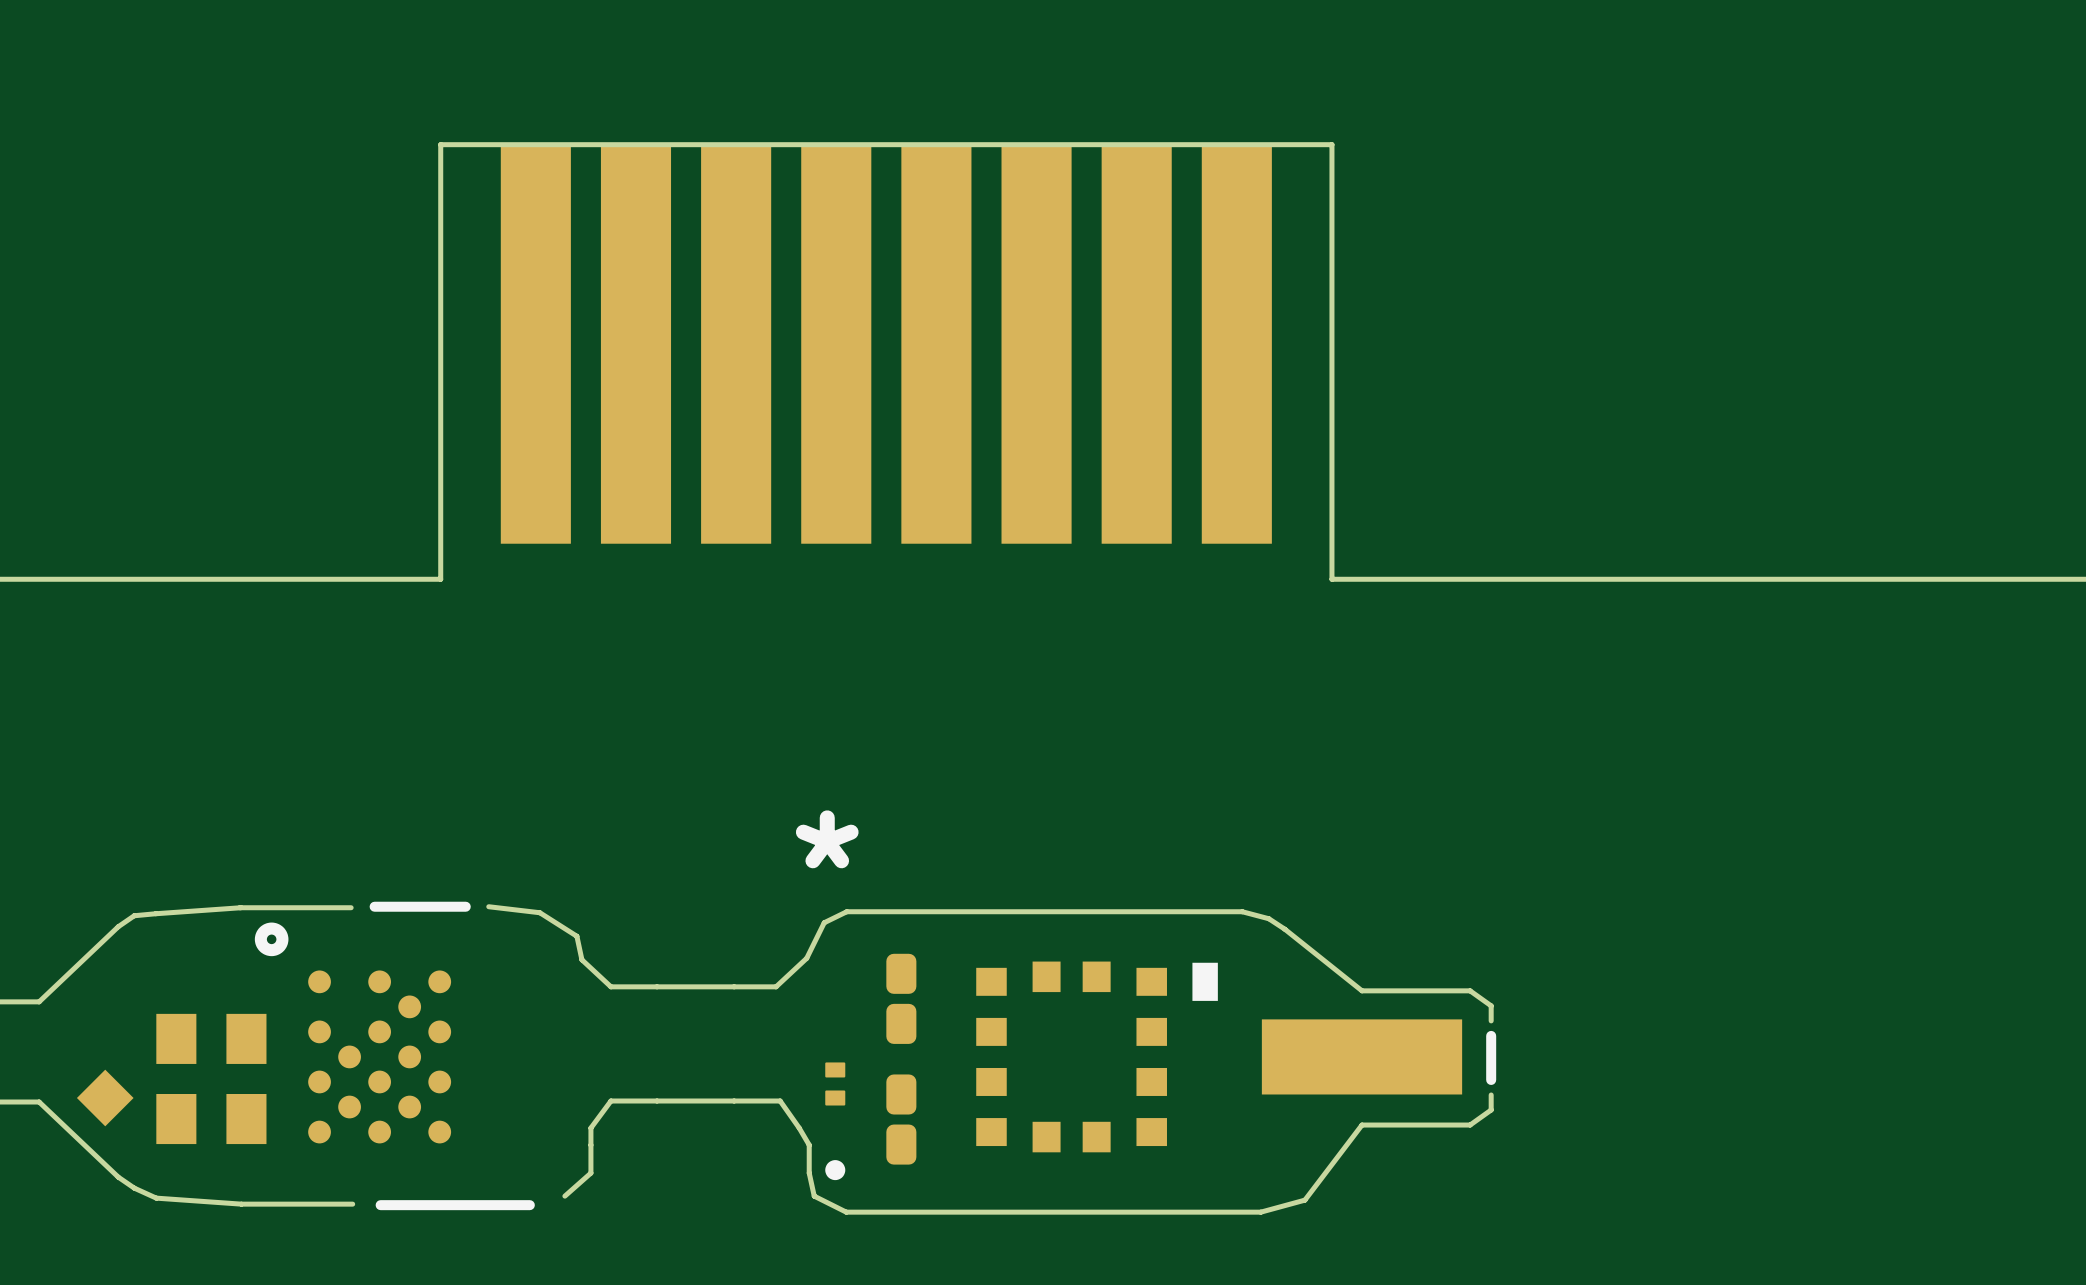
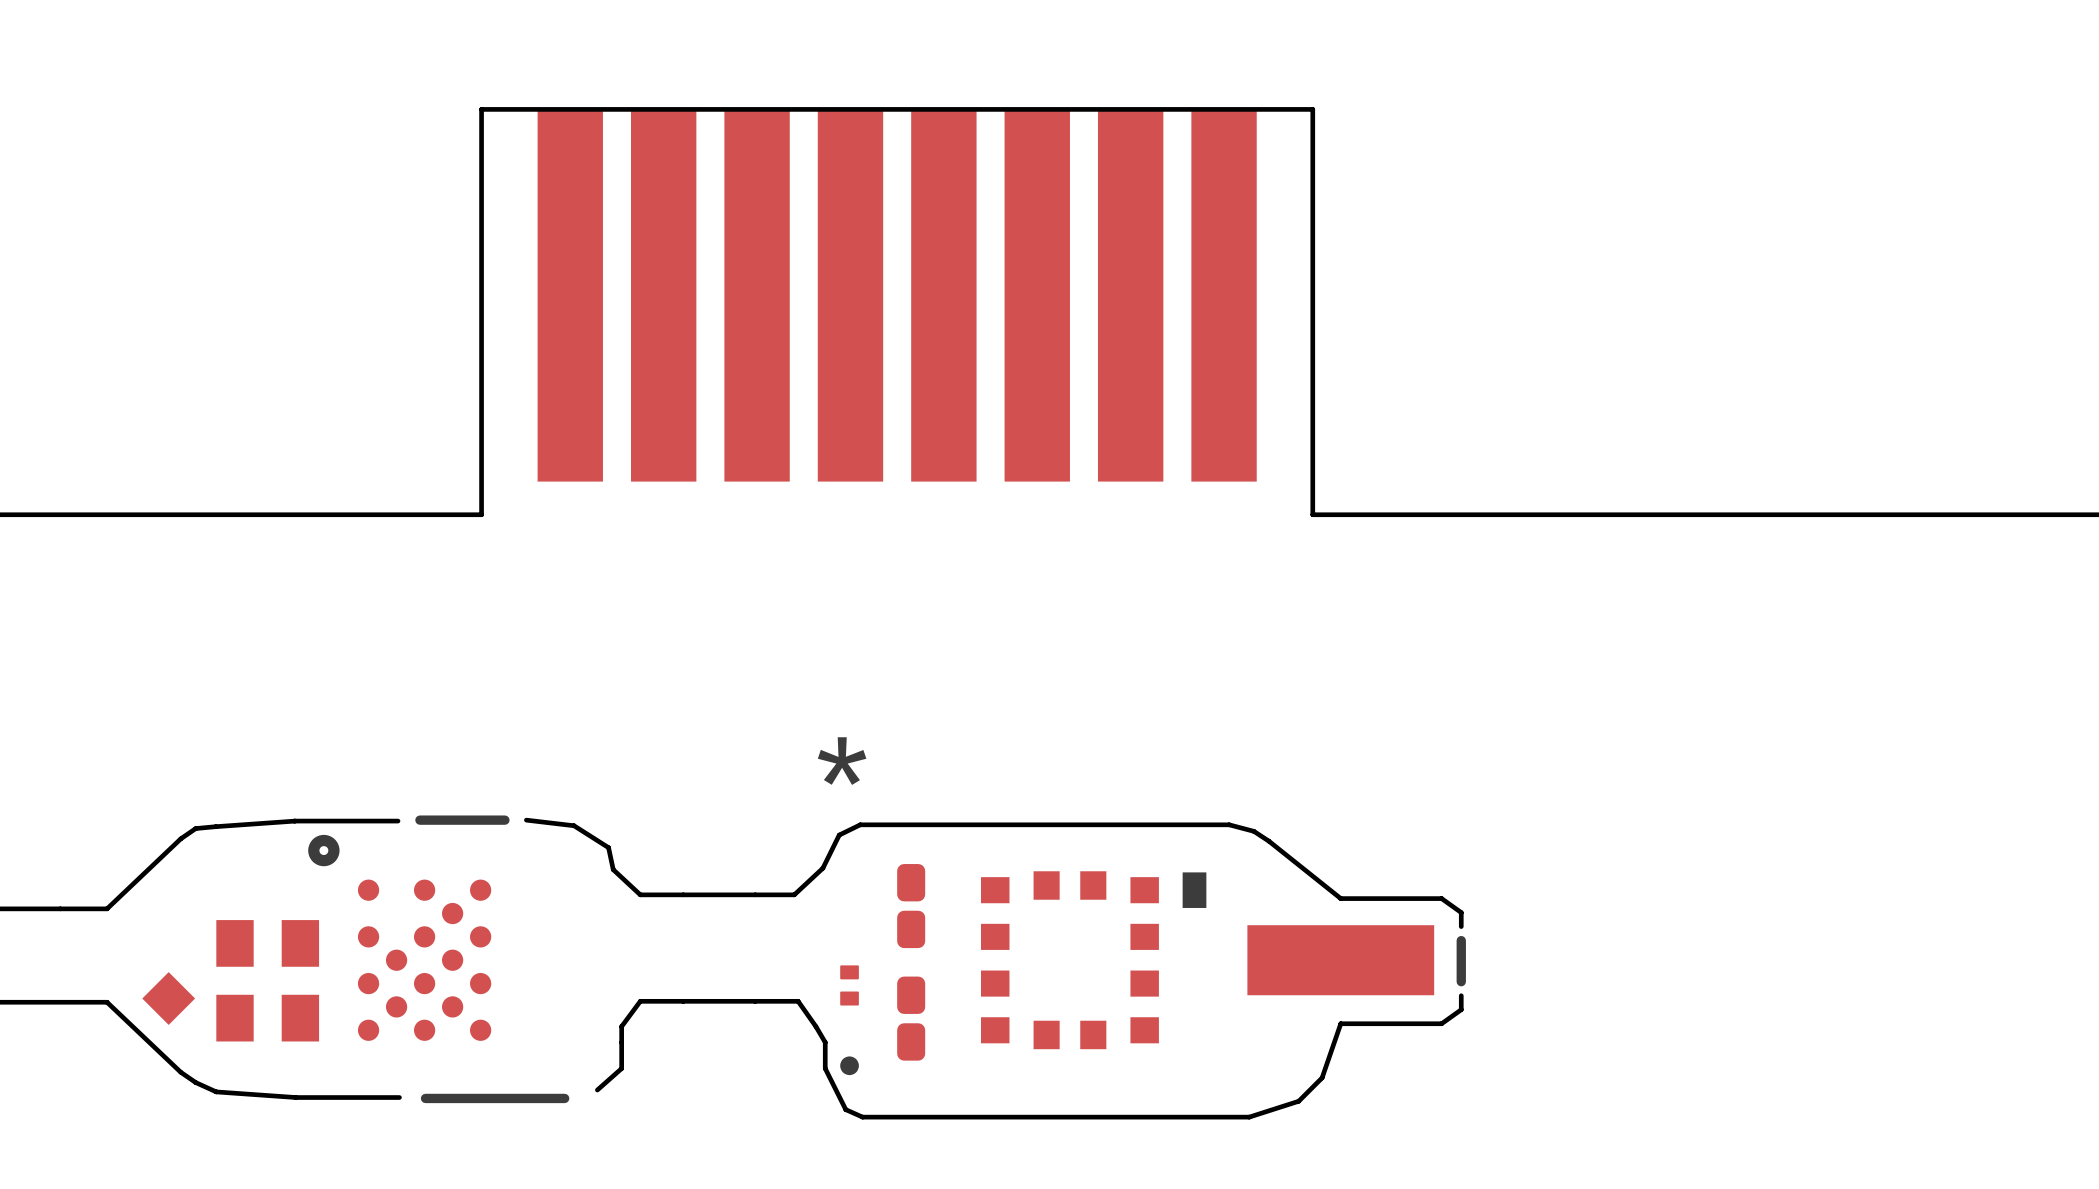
board edge: (1362, 1125) (1304, 1200) (1260, 1212) (846, 1212) (814, 1196) (809, 1173) -> (1340, 1023) (1322, 1077) (1298, 1101) (1249, 1117) (862, 1117) (845, 1109) (825, 1068)

